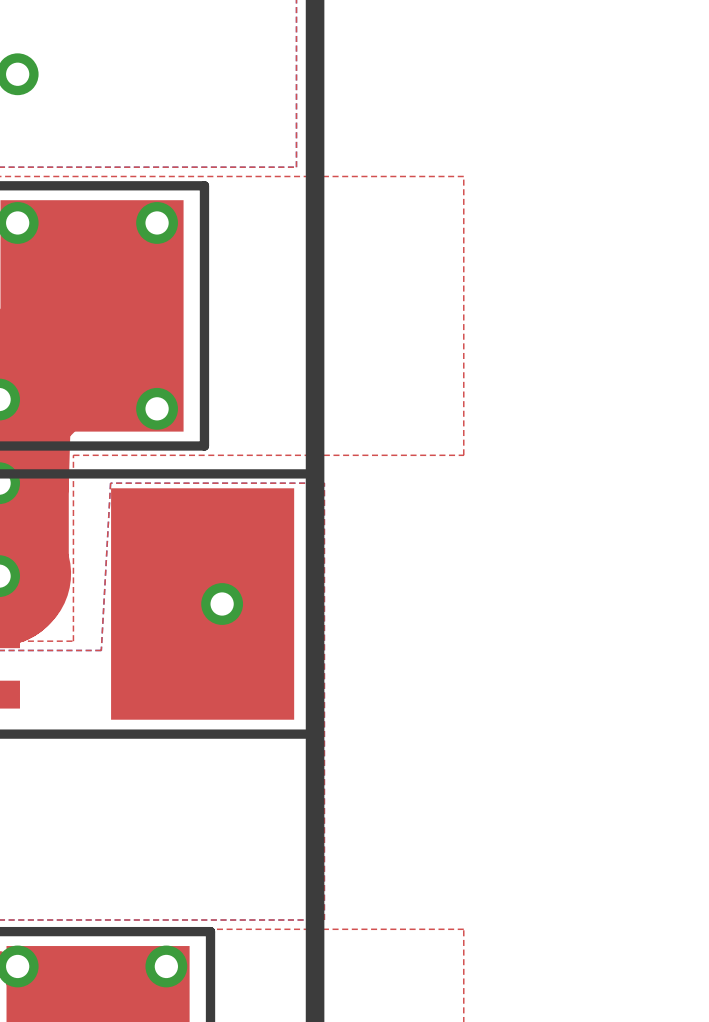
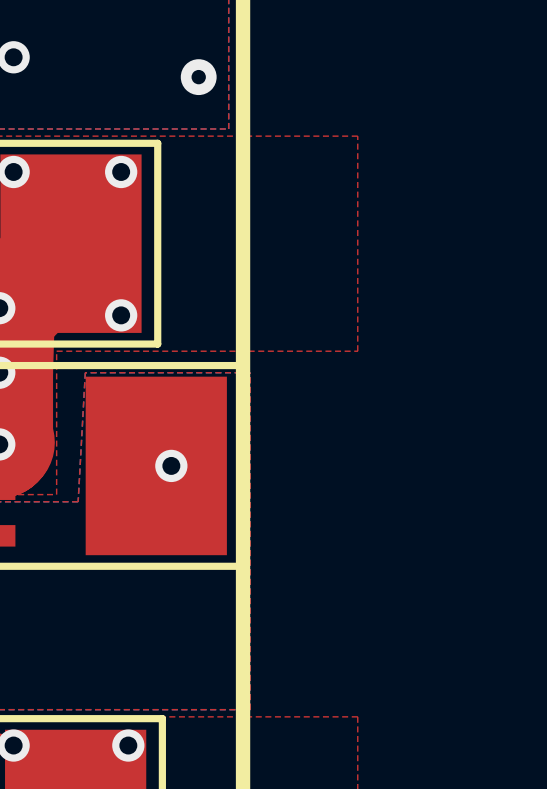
via: none -> (198, 77)

